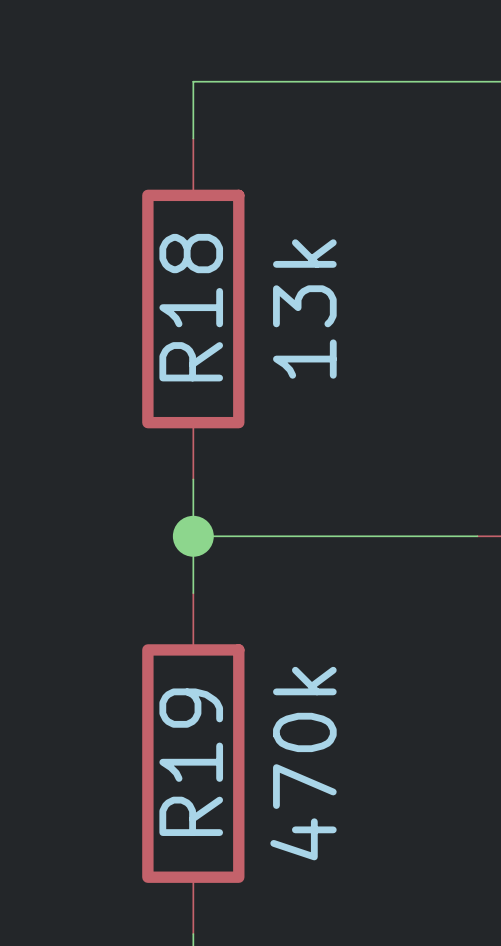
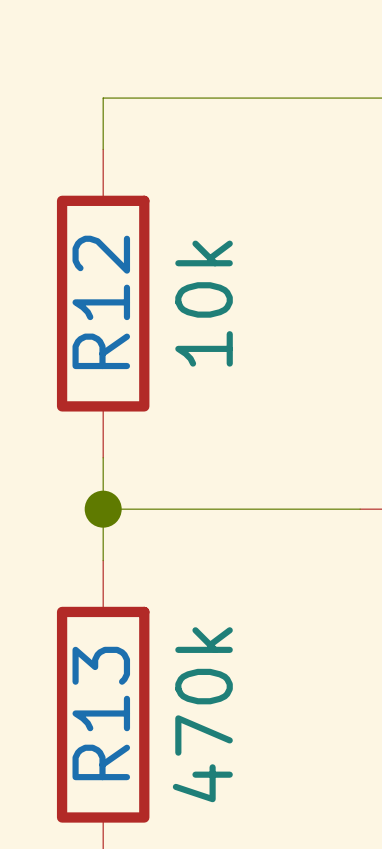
R18 name: R18 (191, 307) -> R12 (101, 302)
R18 value: 13k (304, 309) -> 10k (204, 303)
R19 name: R19 (191, 762) -> R13 (101, 713)

